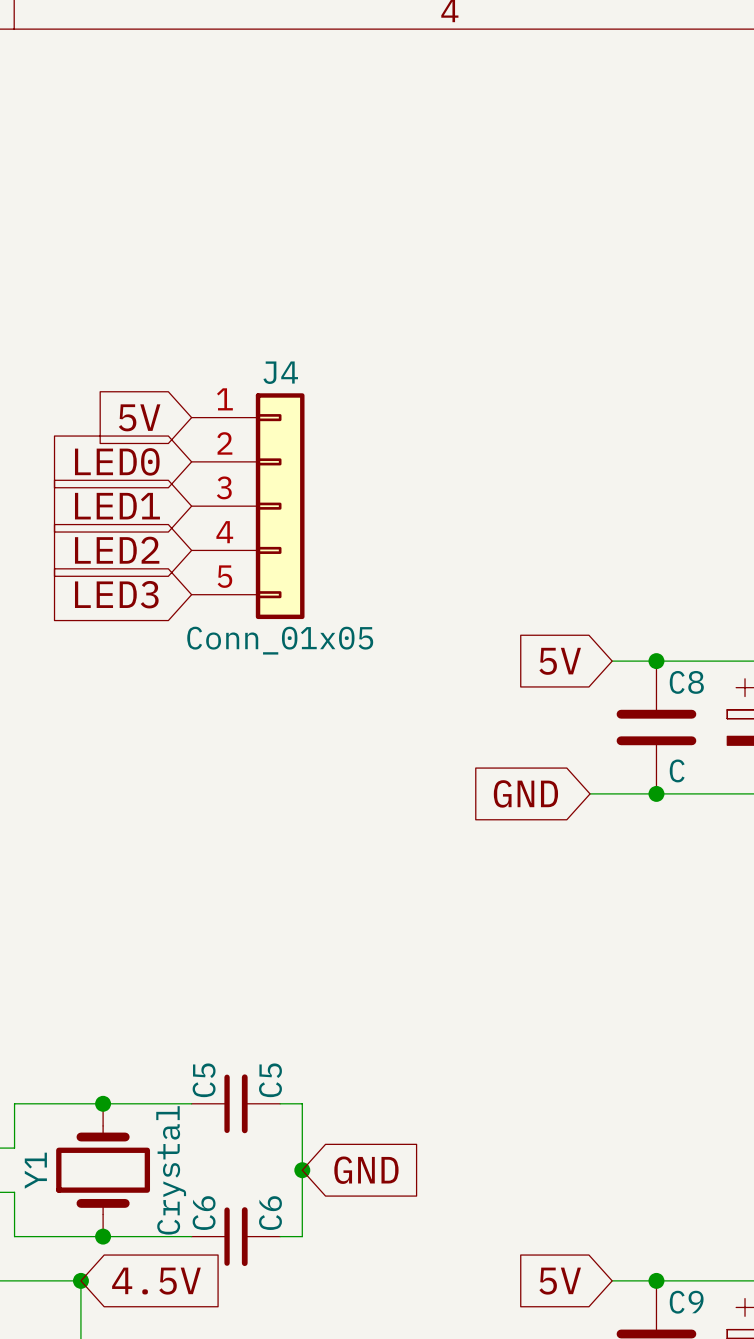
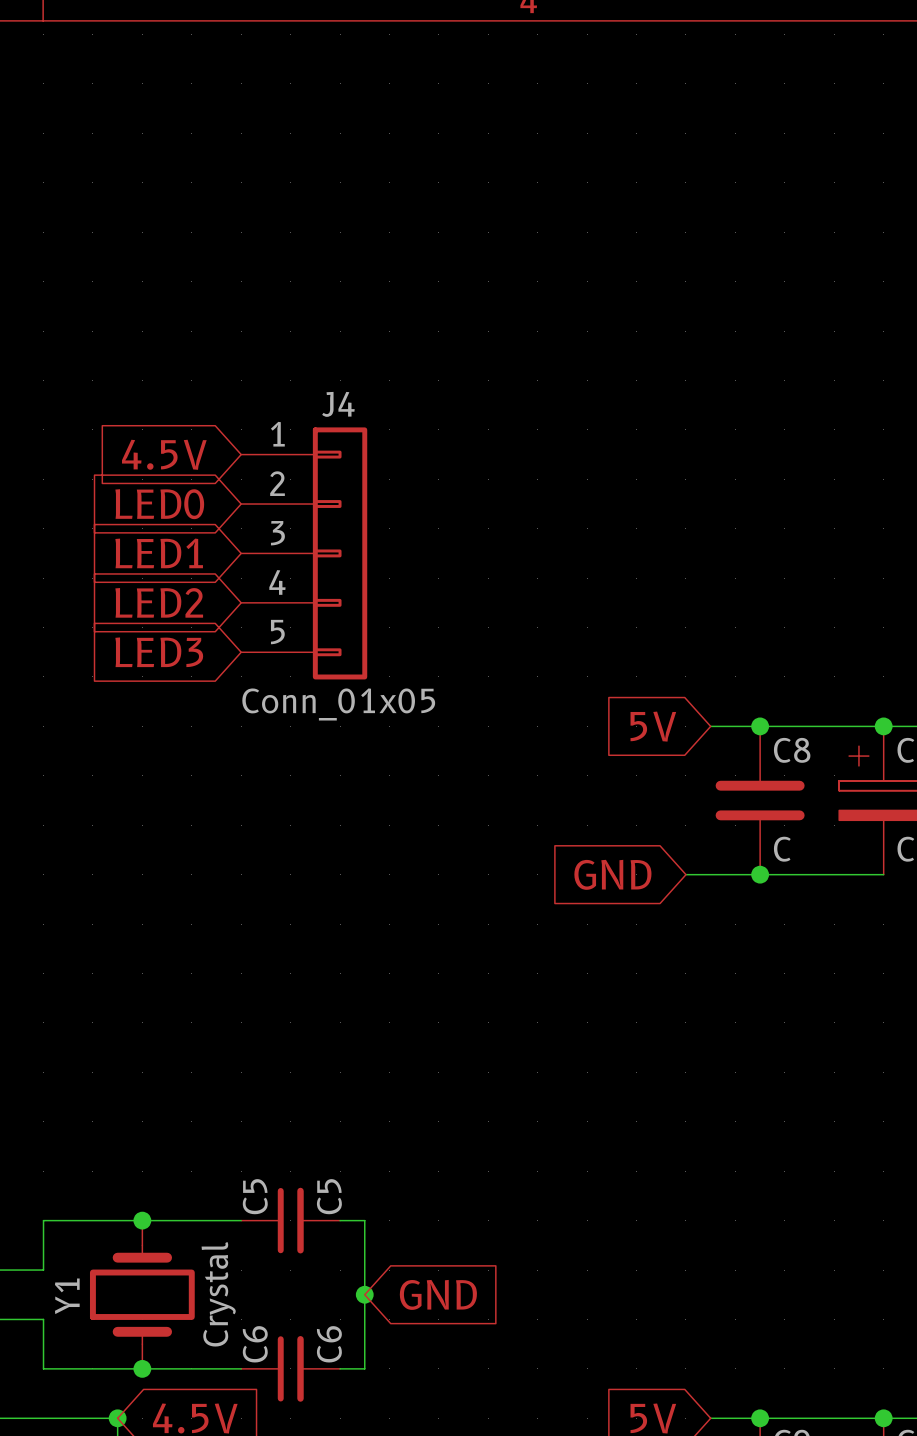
global label: 5V (139, 417) -> 4.5V (164, 454)

